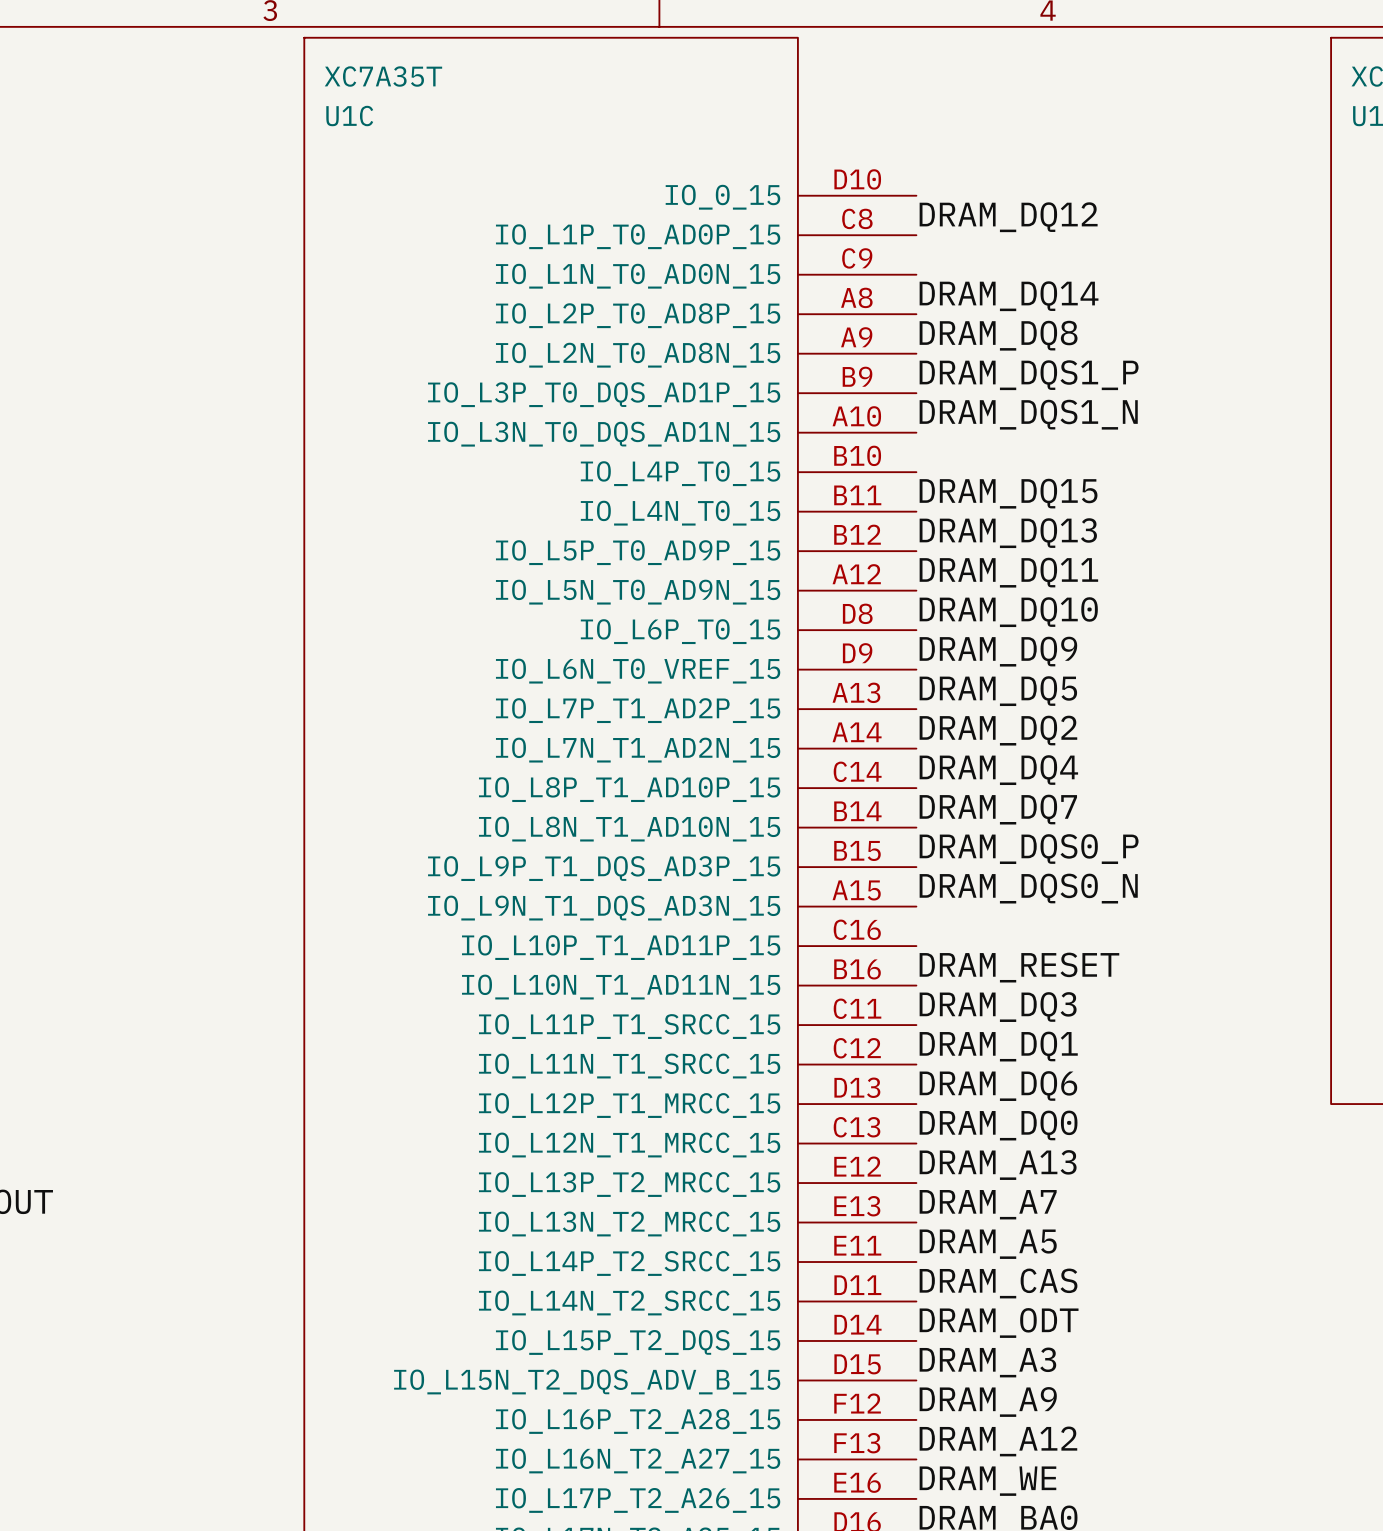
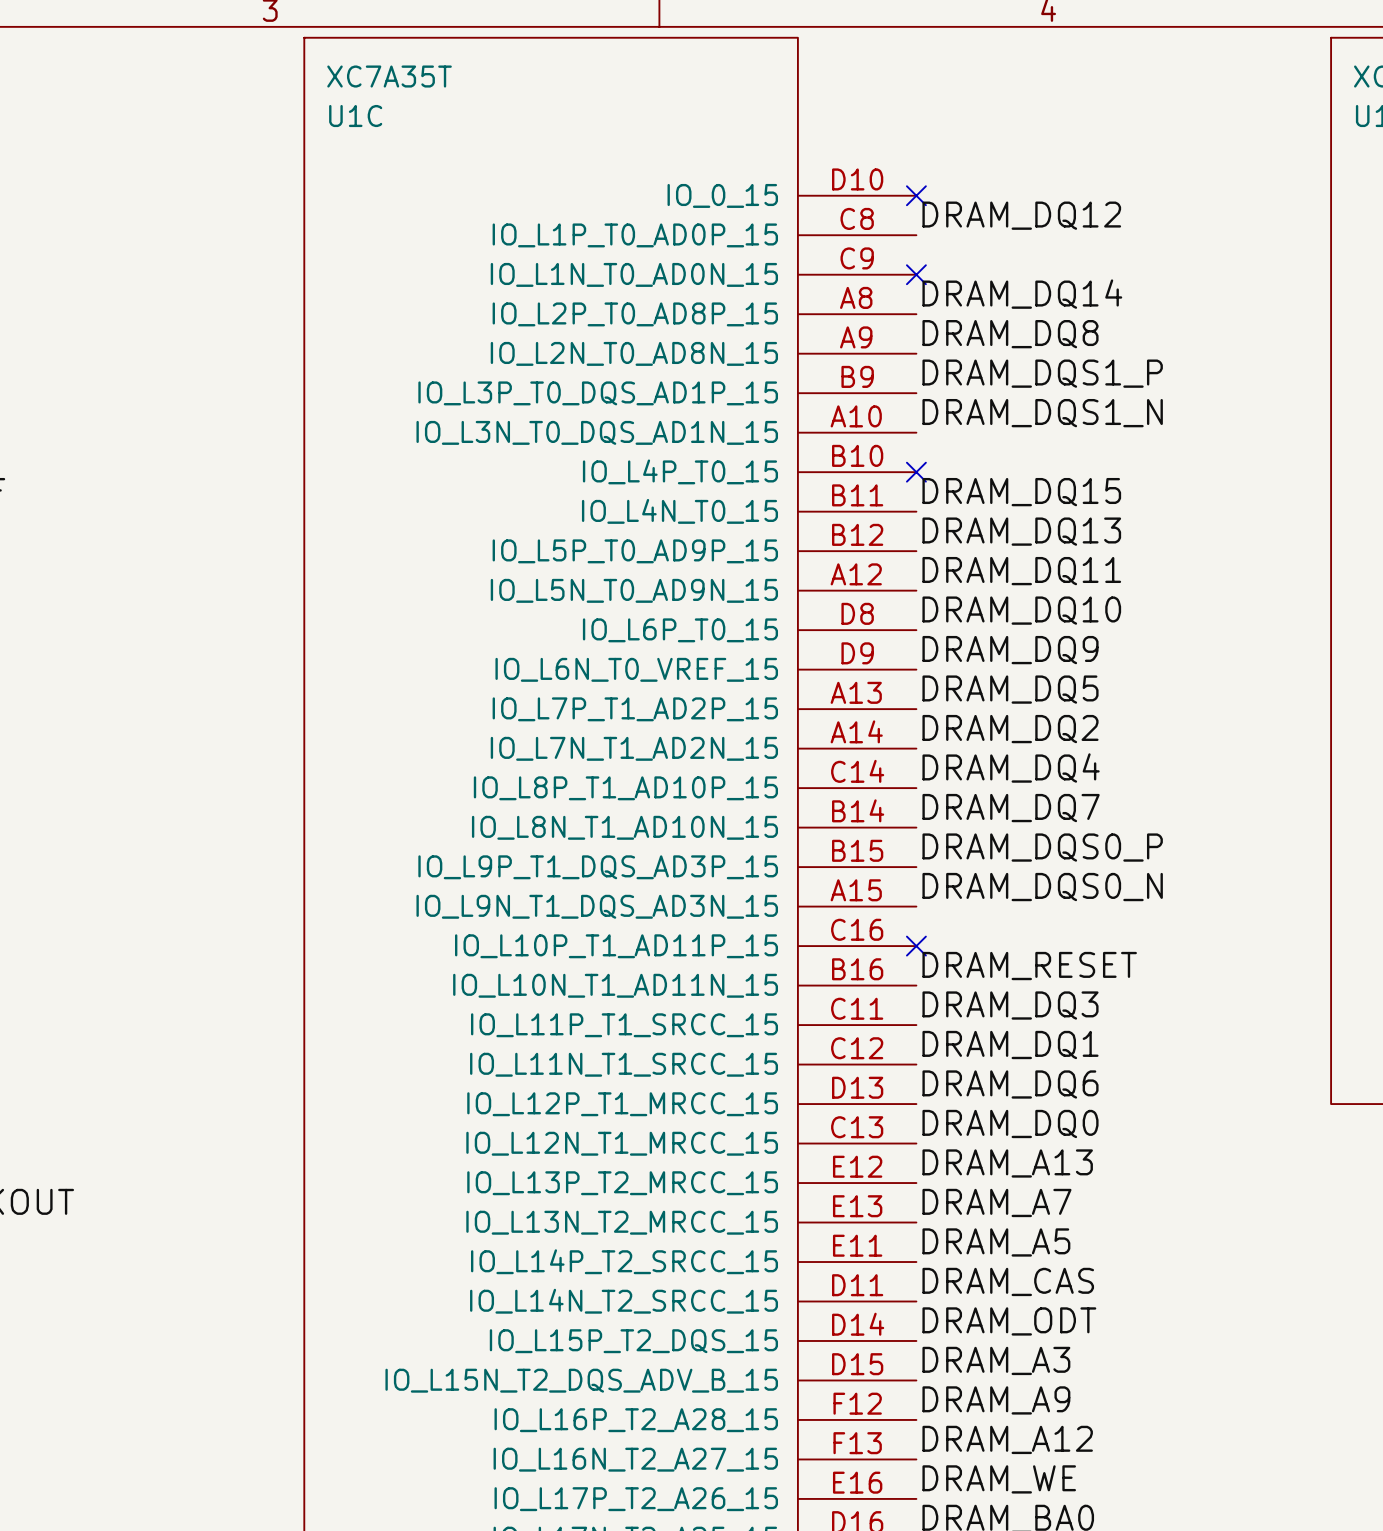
no-connect mark: none -> (916, 195)
no-connect mark: none -> (916, 274)
no-connect mark: none -> (916, 472)
no-connect mark: none -> (916, 946)

